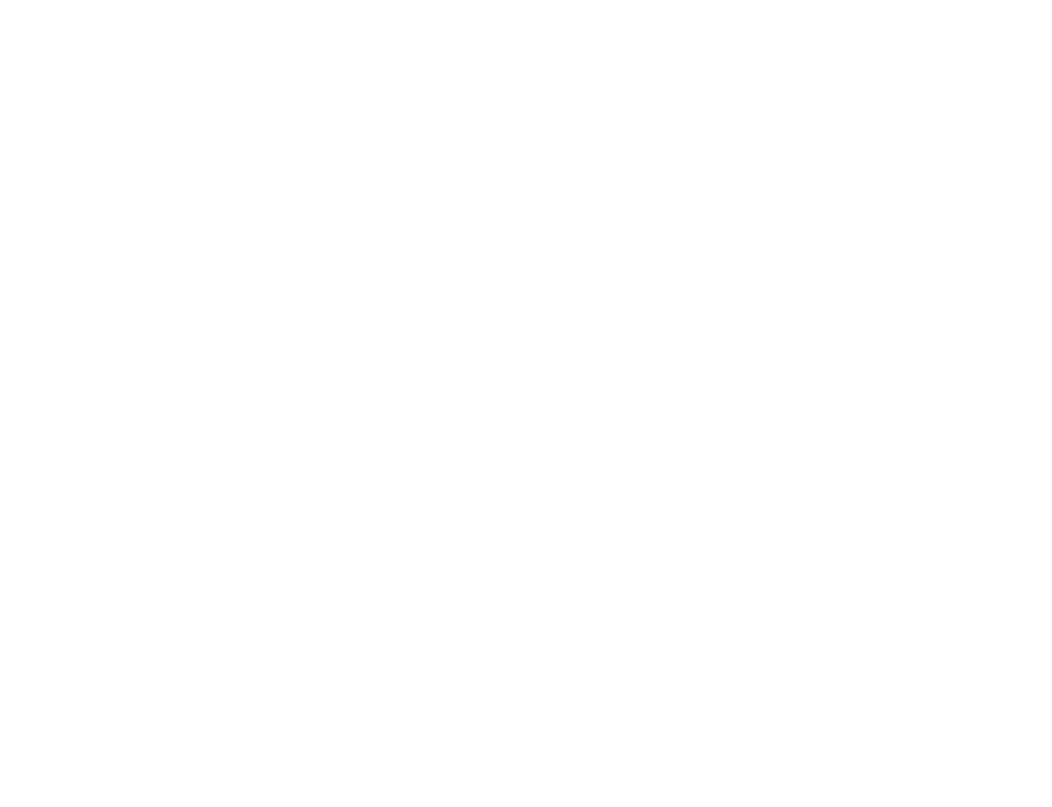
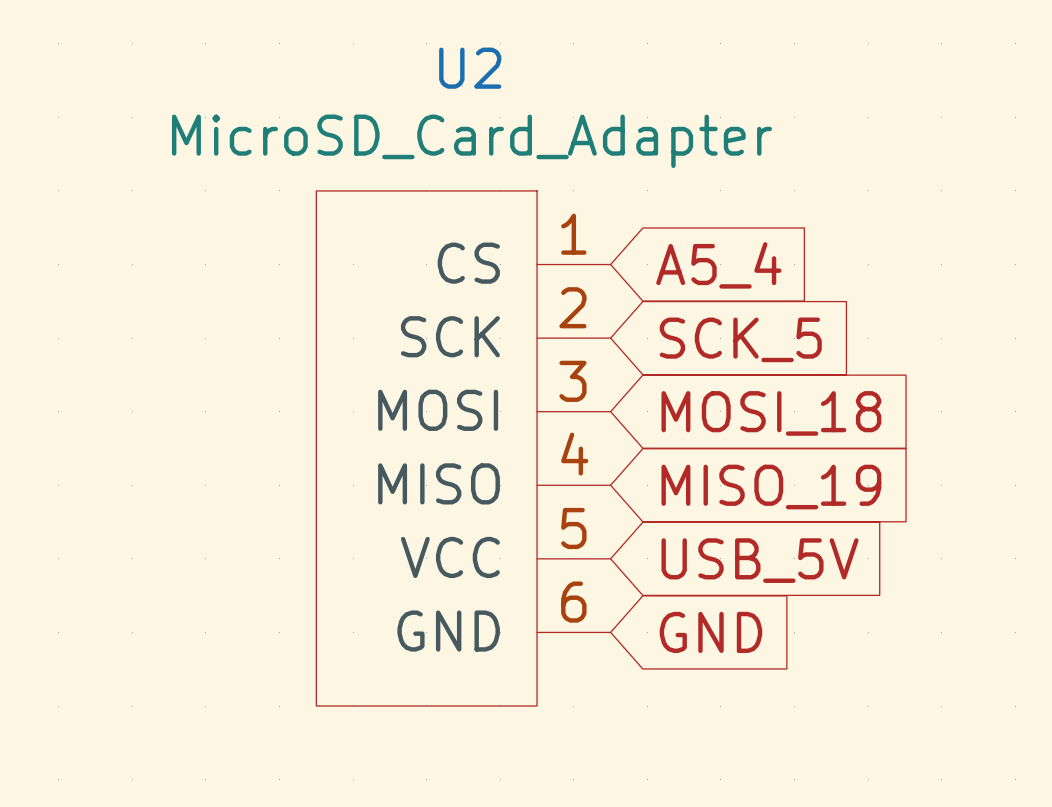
global label: none -> A5_4 (718, 265)
global label: none -> SCK_5 (740, 339)
global label: none -> MOSI_18 (771, 413)
U2: none -> MicroSD_Card_Adapter (463, 448)
global label: none -> MISO_19 (771, 487)
global label: none -> USB_5V (760, 560)
global label: none -> GND (710, 632)

